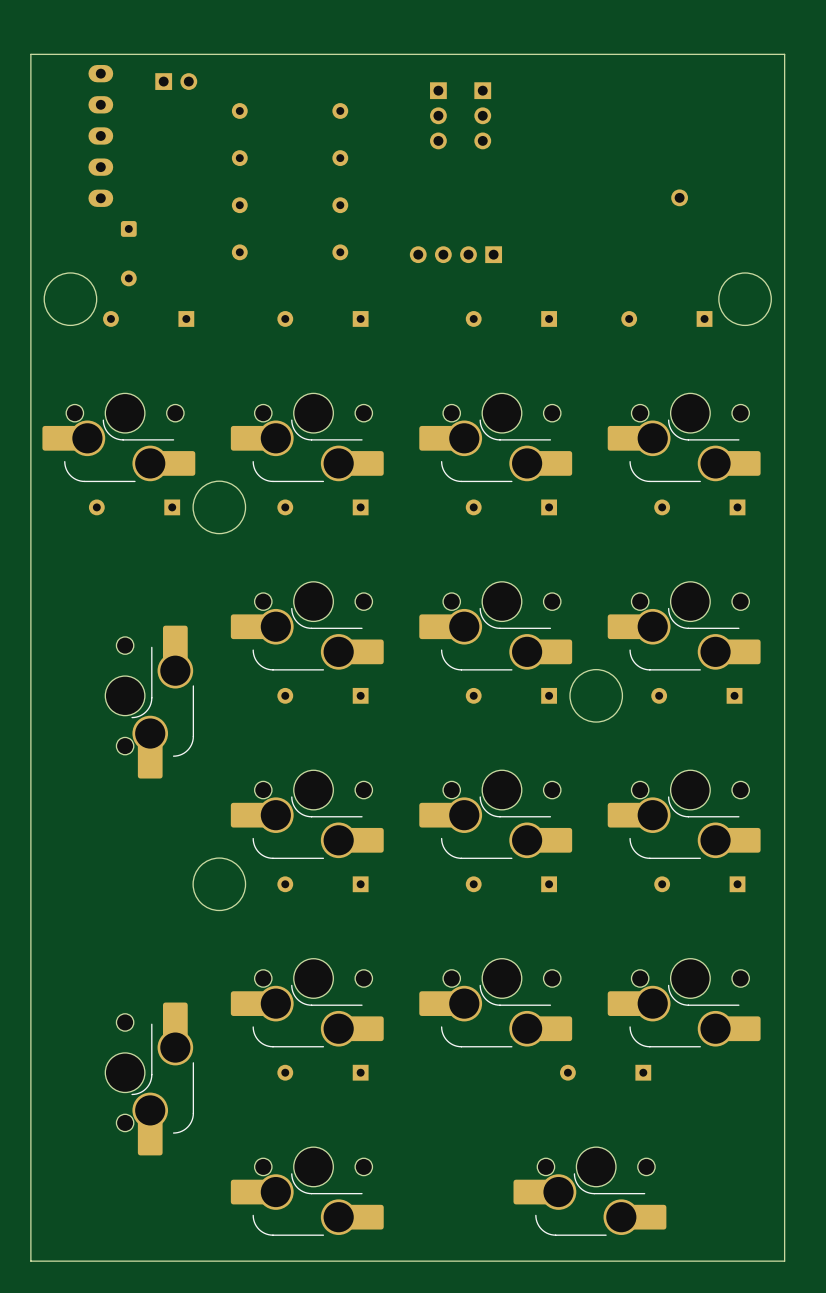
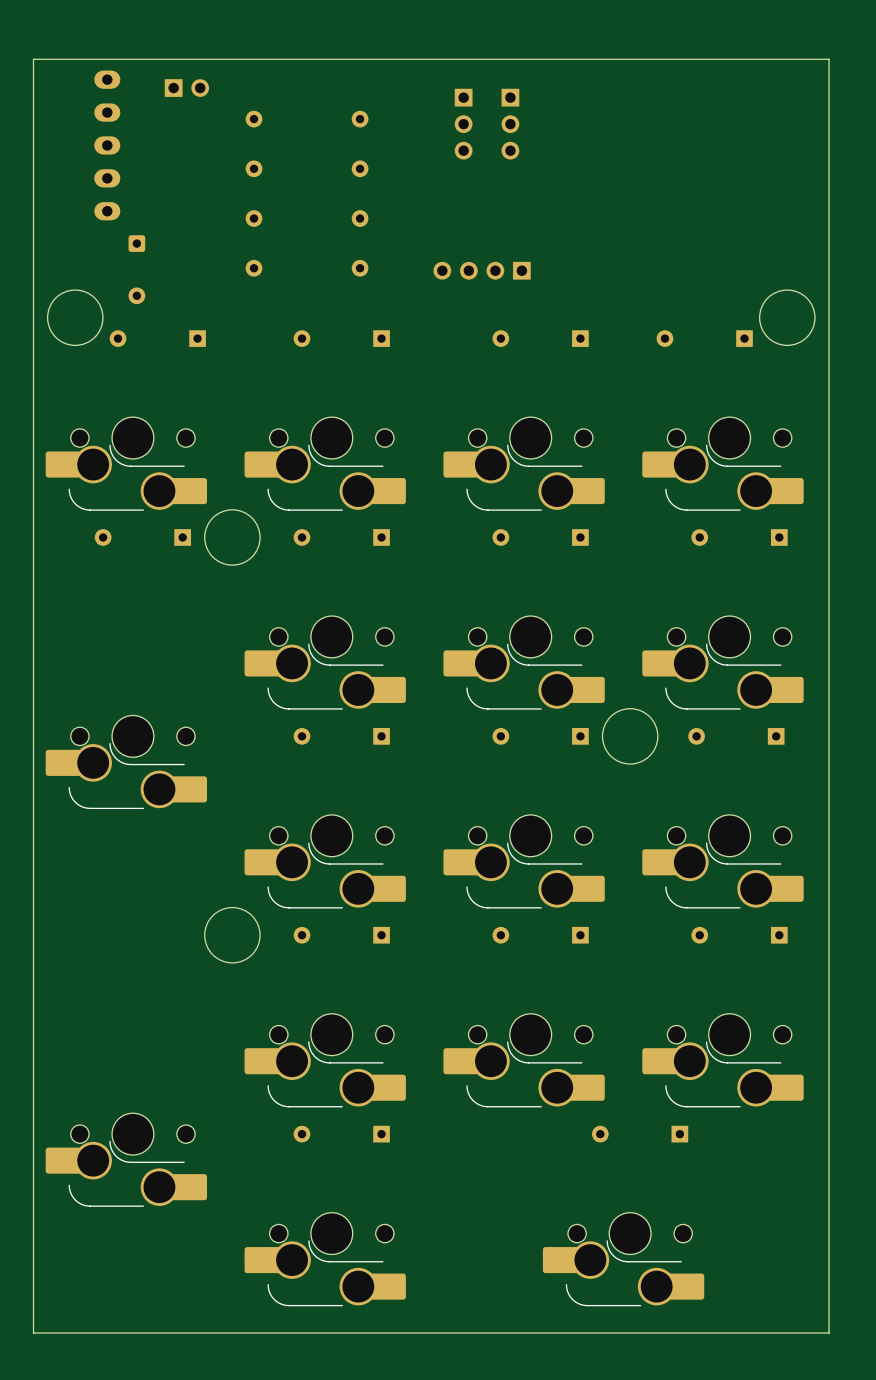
part: (679, 197) -> none
part rotation: 0° (149, 702) -> 90° clockwise (126, 762)
part rotation: 0° (149, 1078) -> 90° clockwise (126, 1160)

